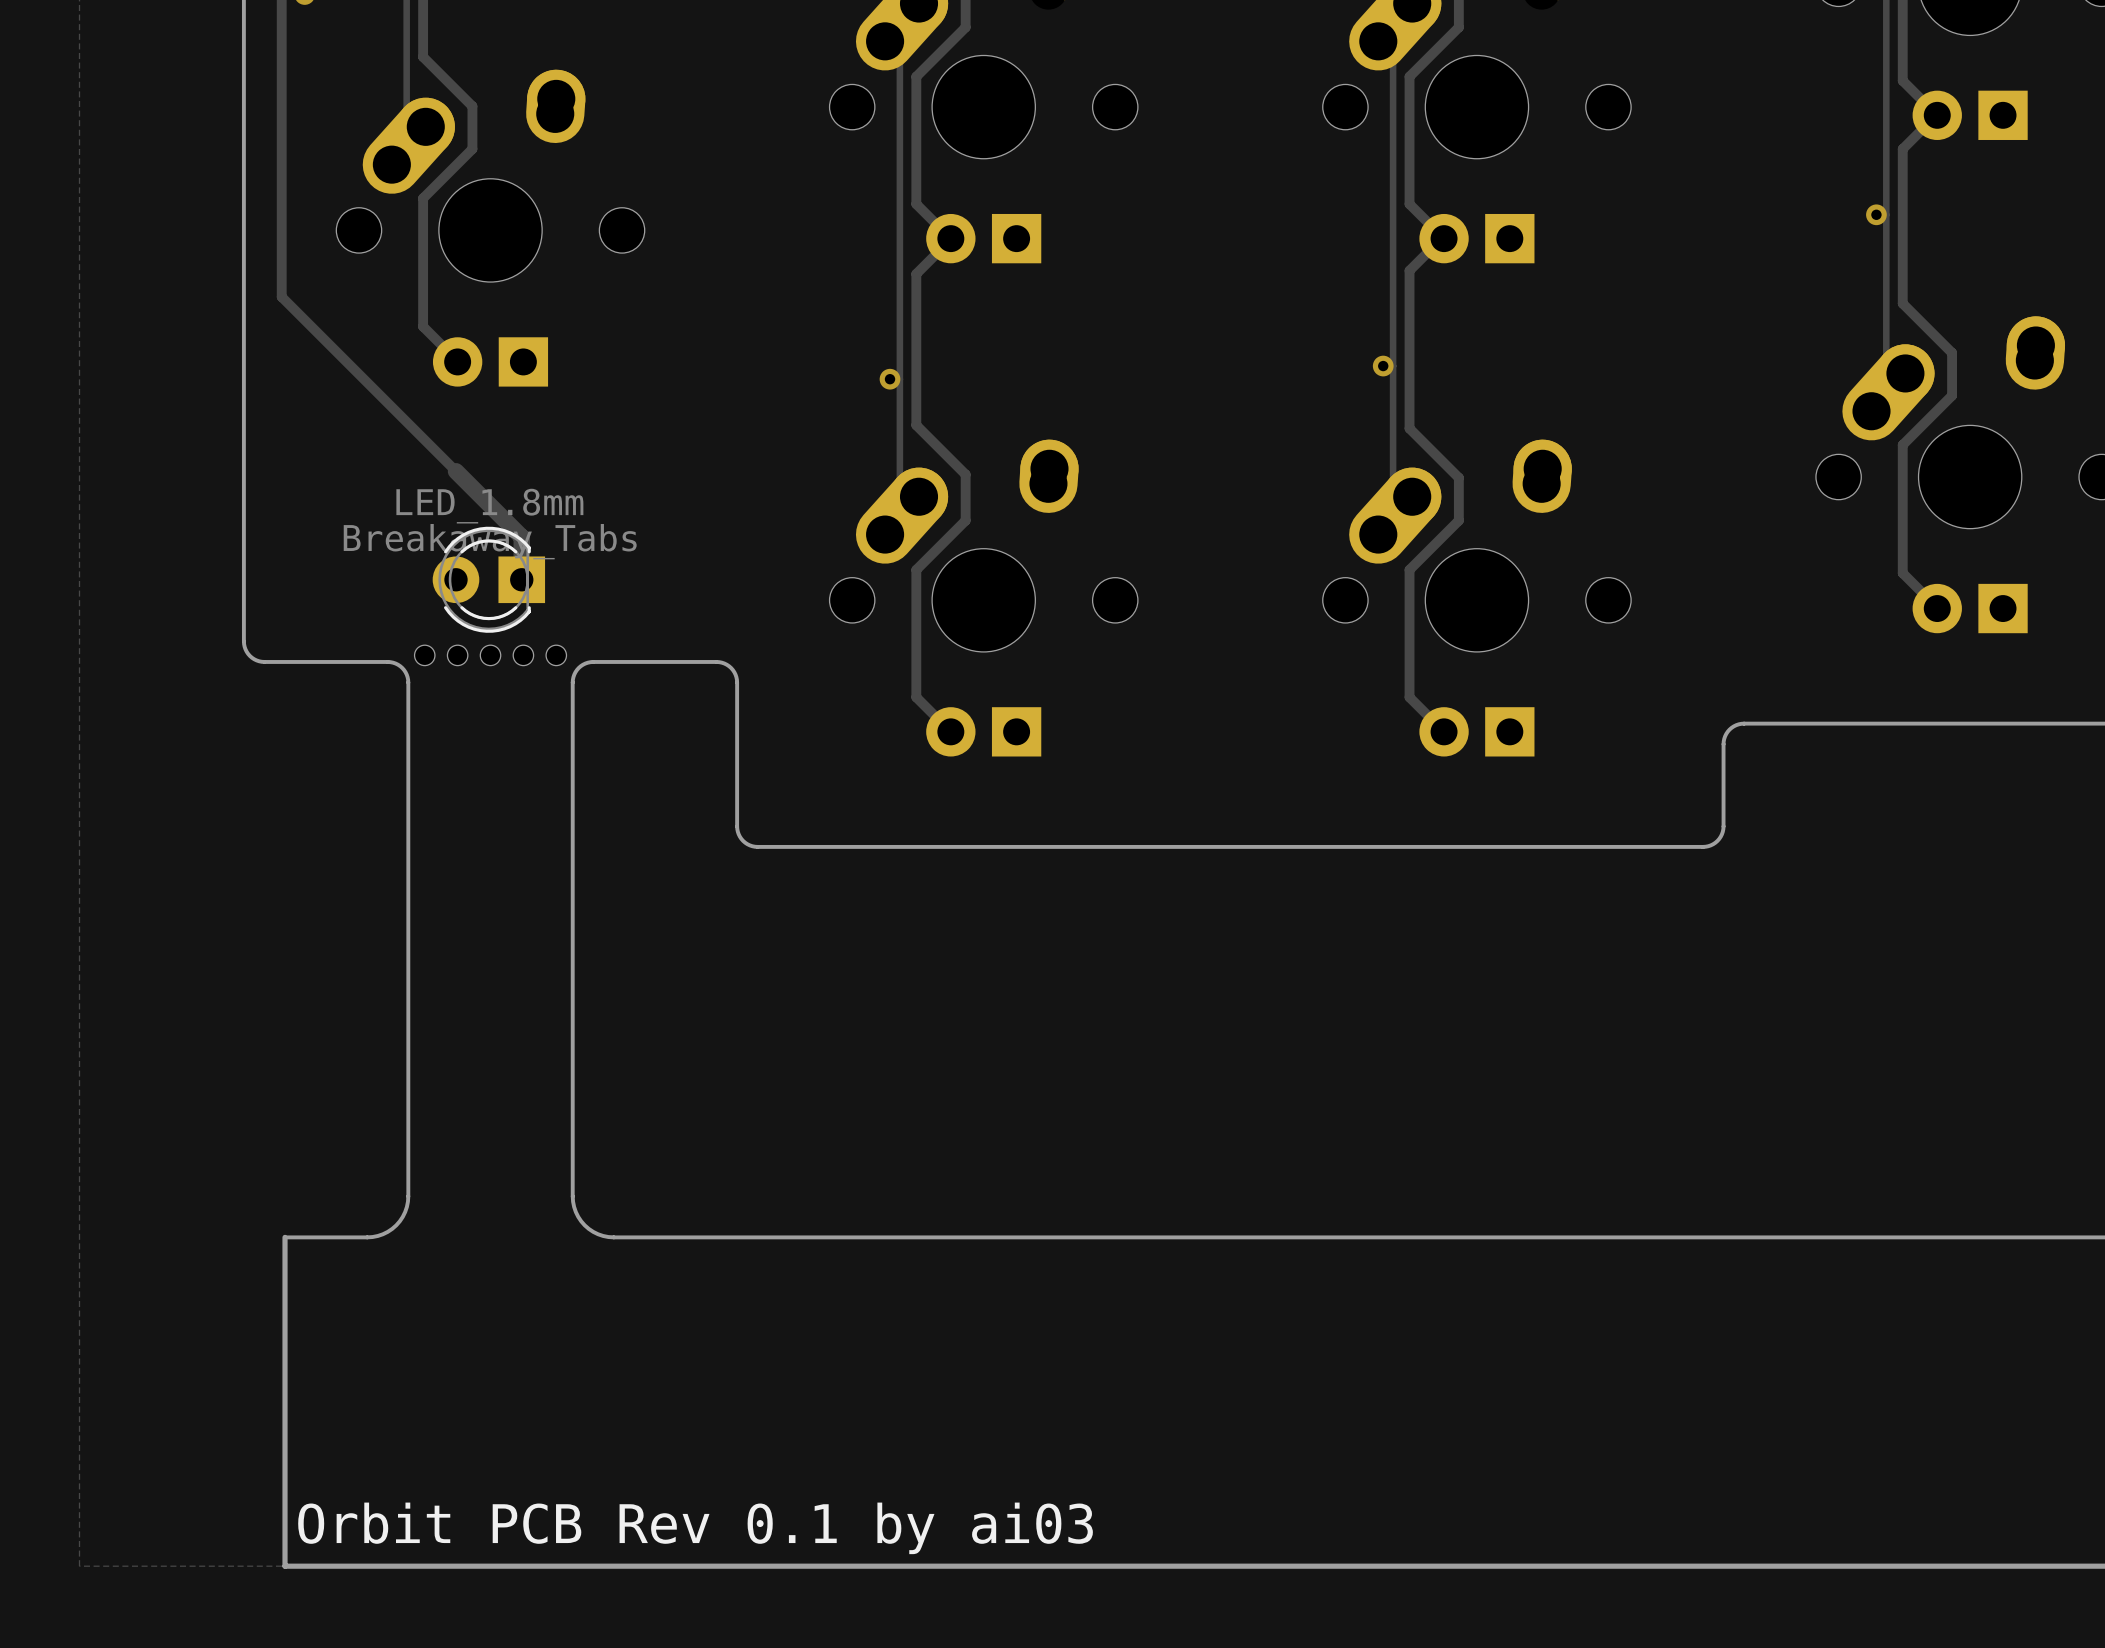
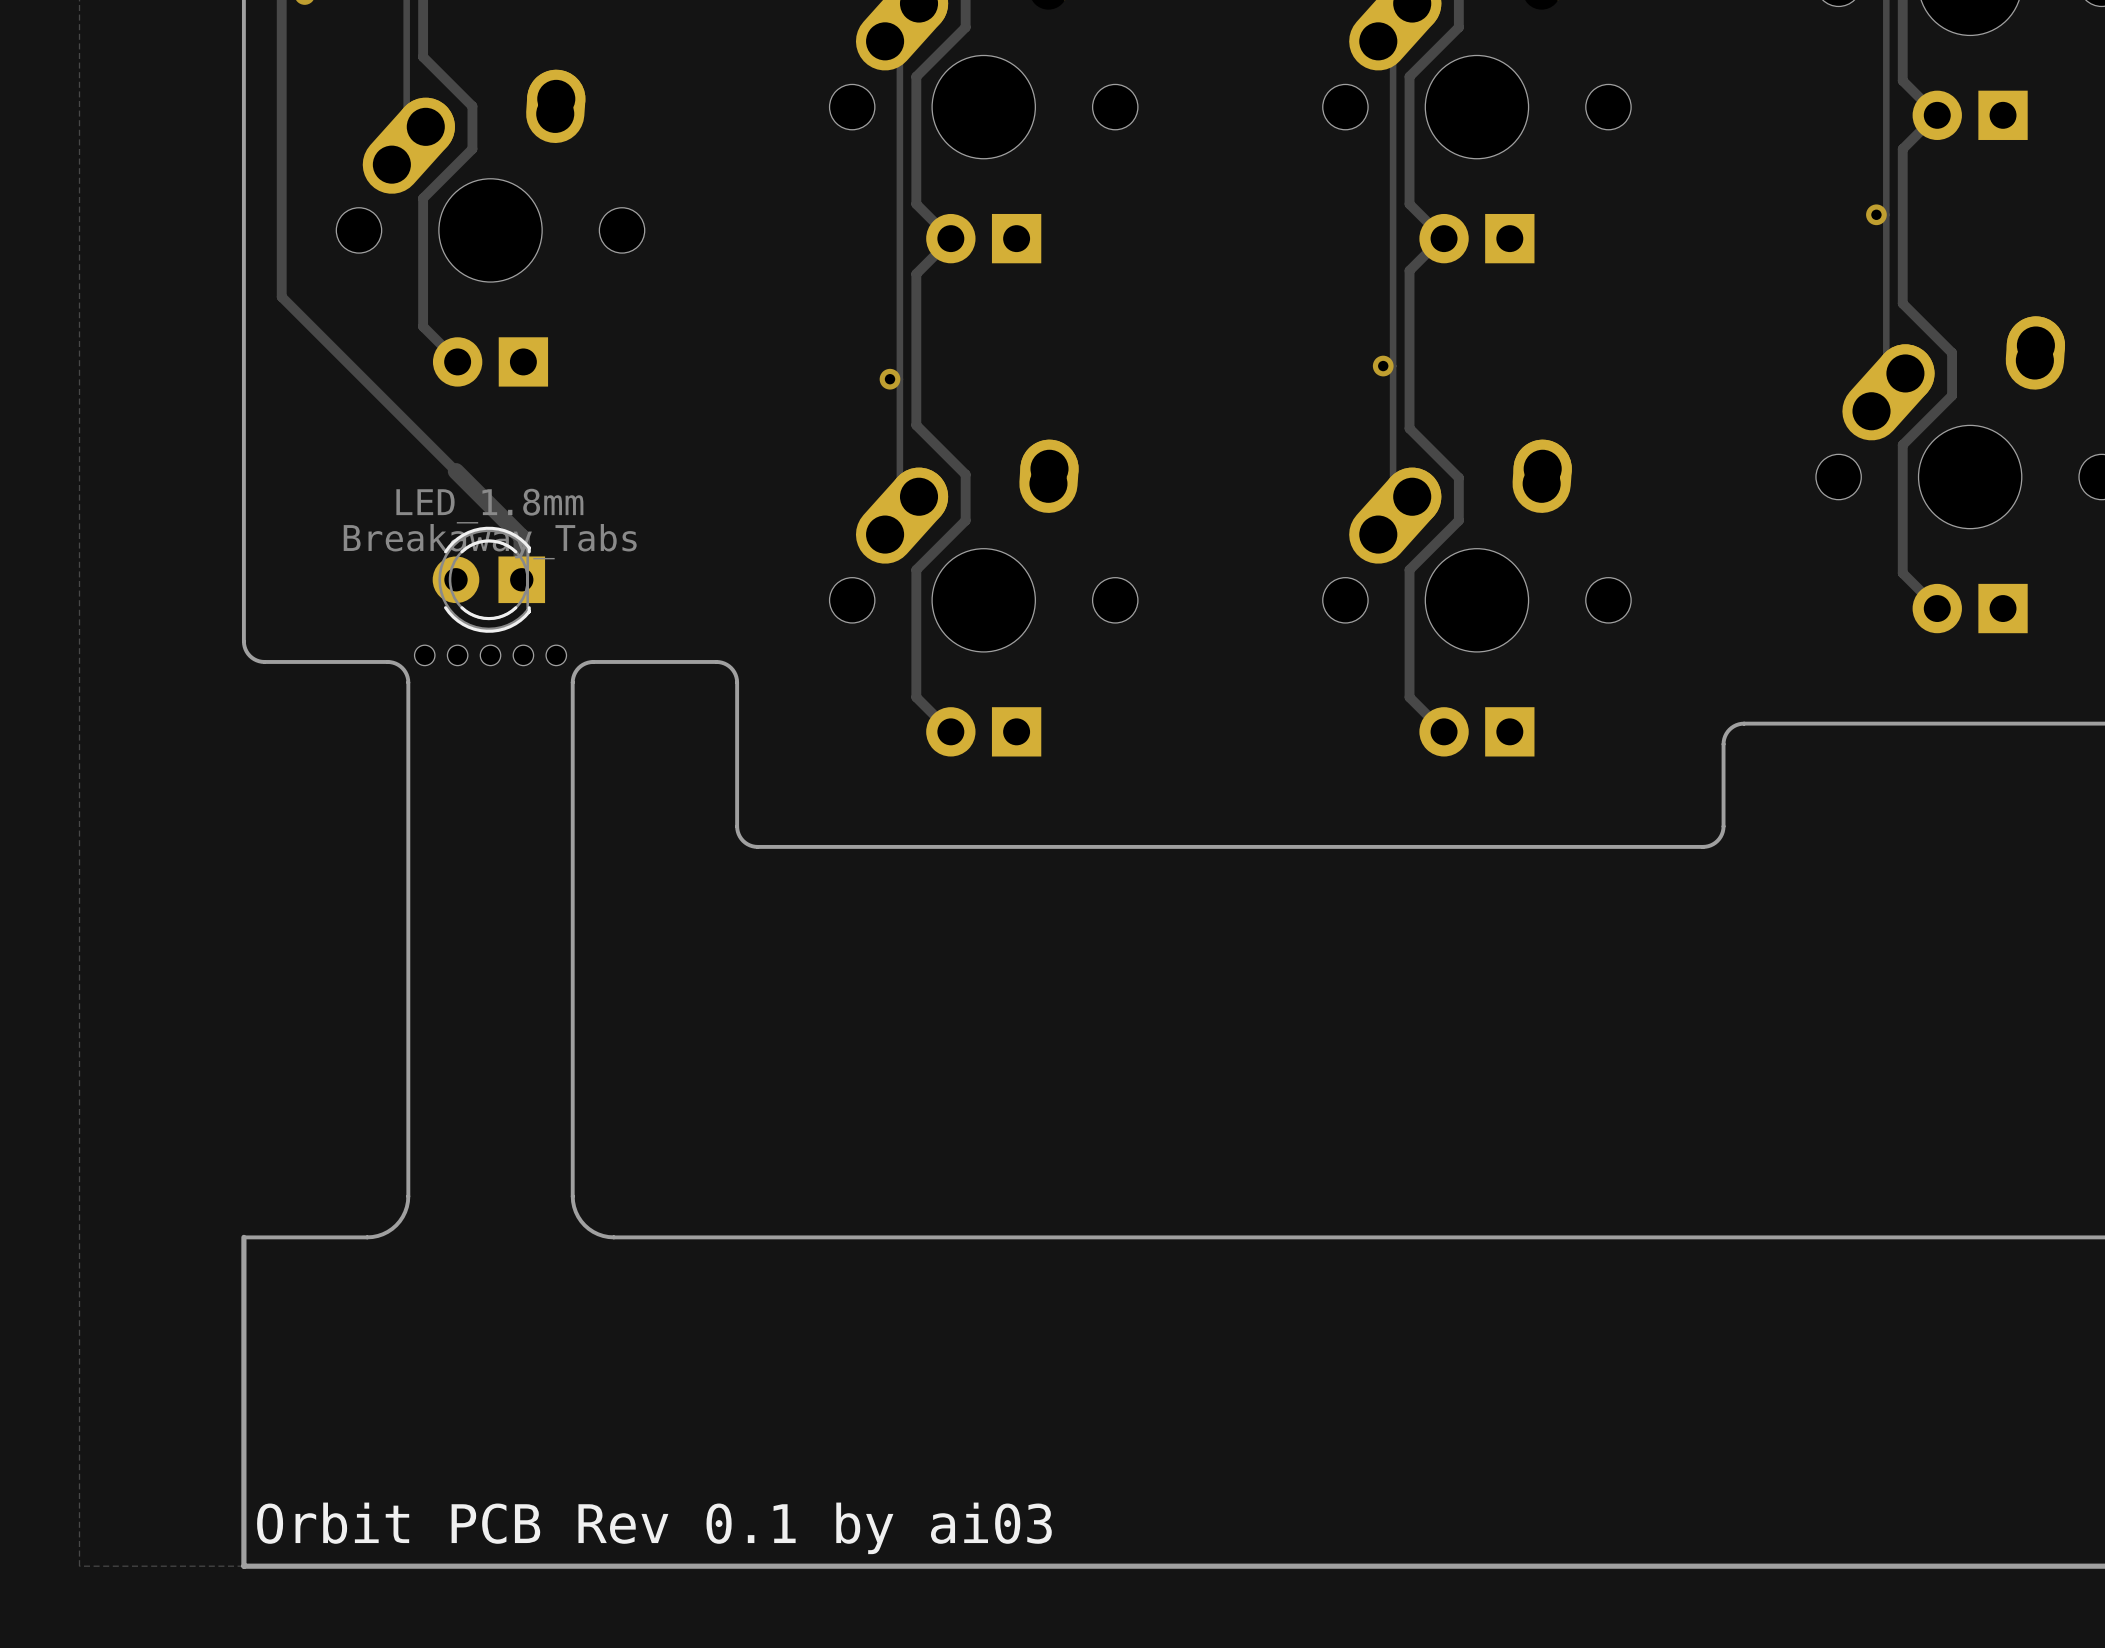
board edge: (285, 1237) (285, 1566) -> (285, 1237) (243, 1237) (243, 1566) (285, 1566)
text position: Orbit PCB Rev 0.1 by ai03 (695, 1528) -> Orbit PCB Rev 0.1 by ai03 (654, 1528)

